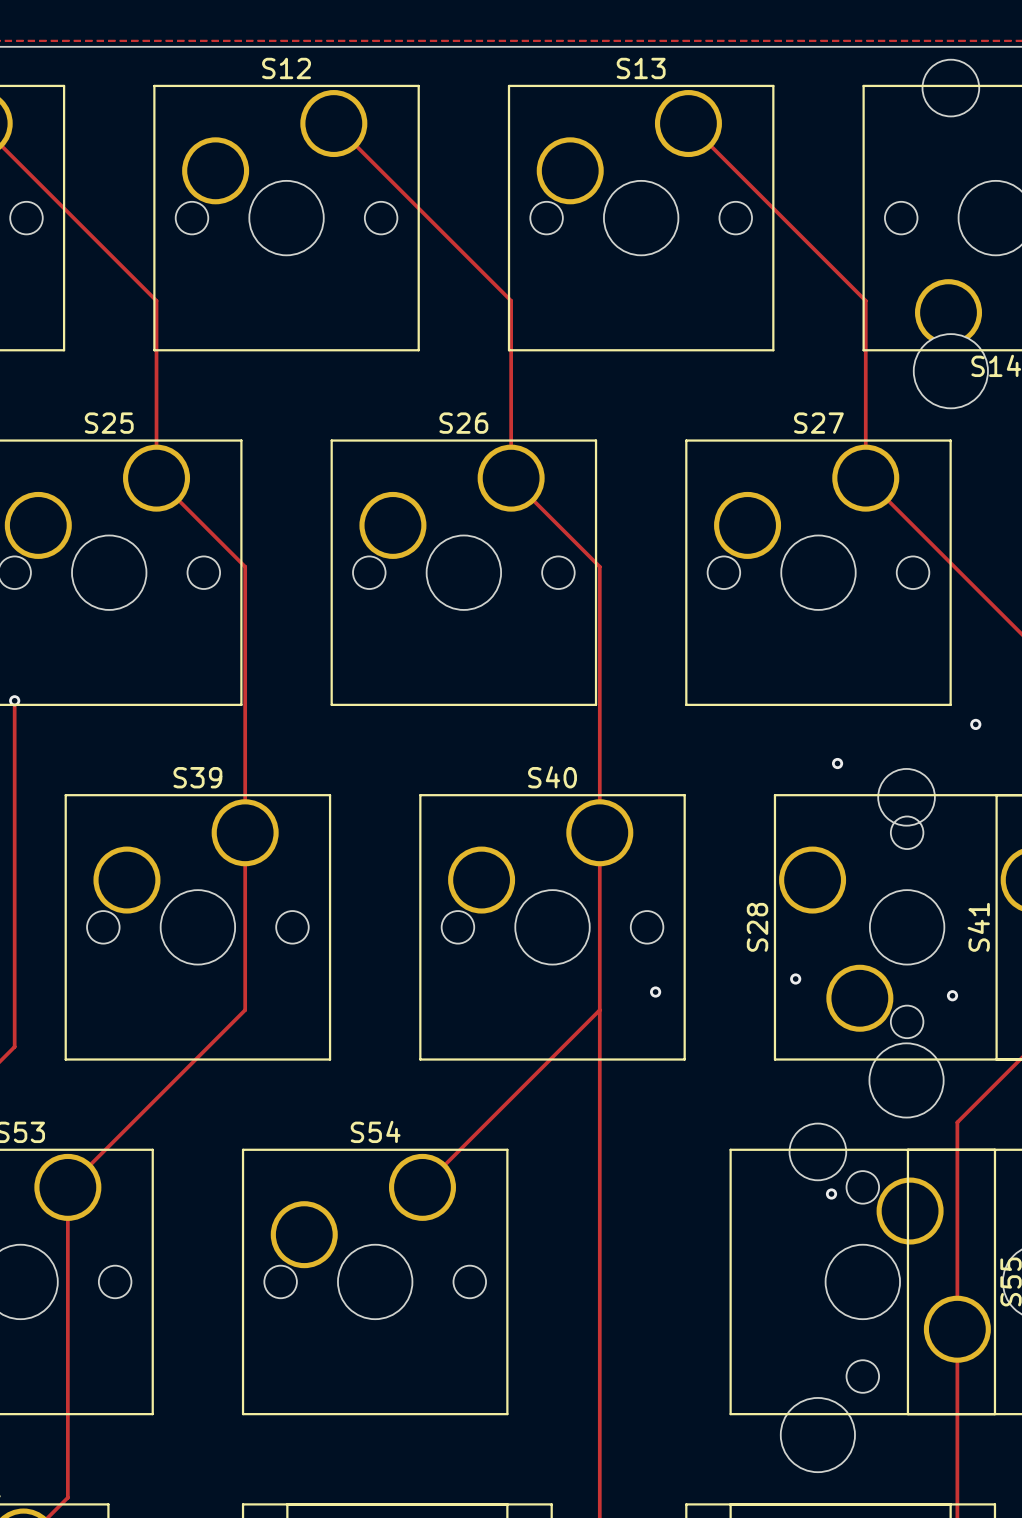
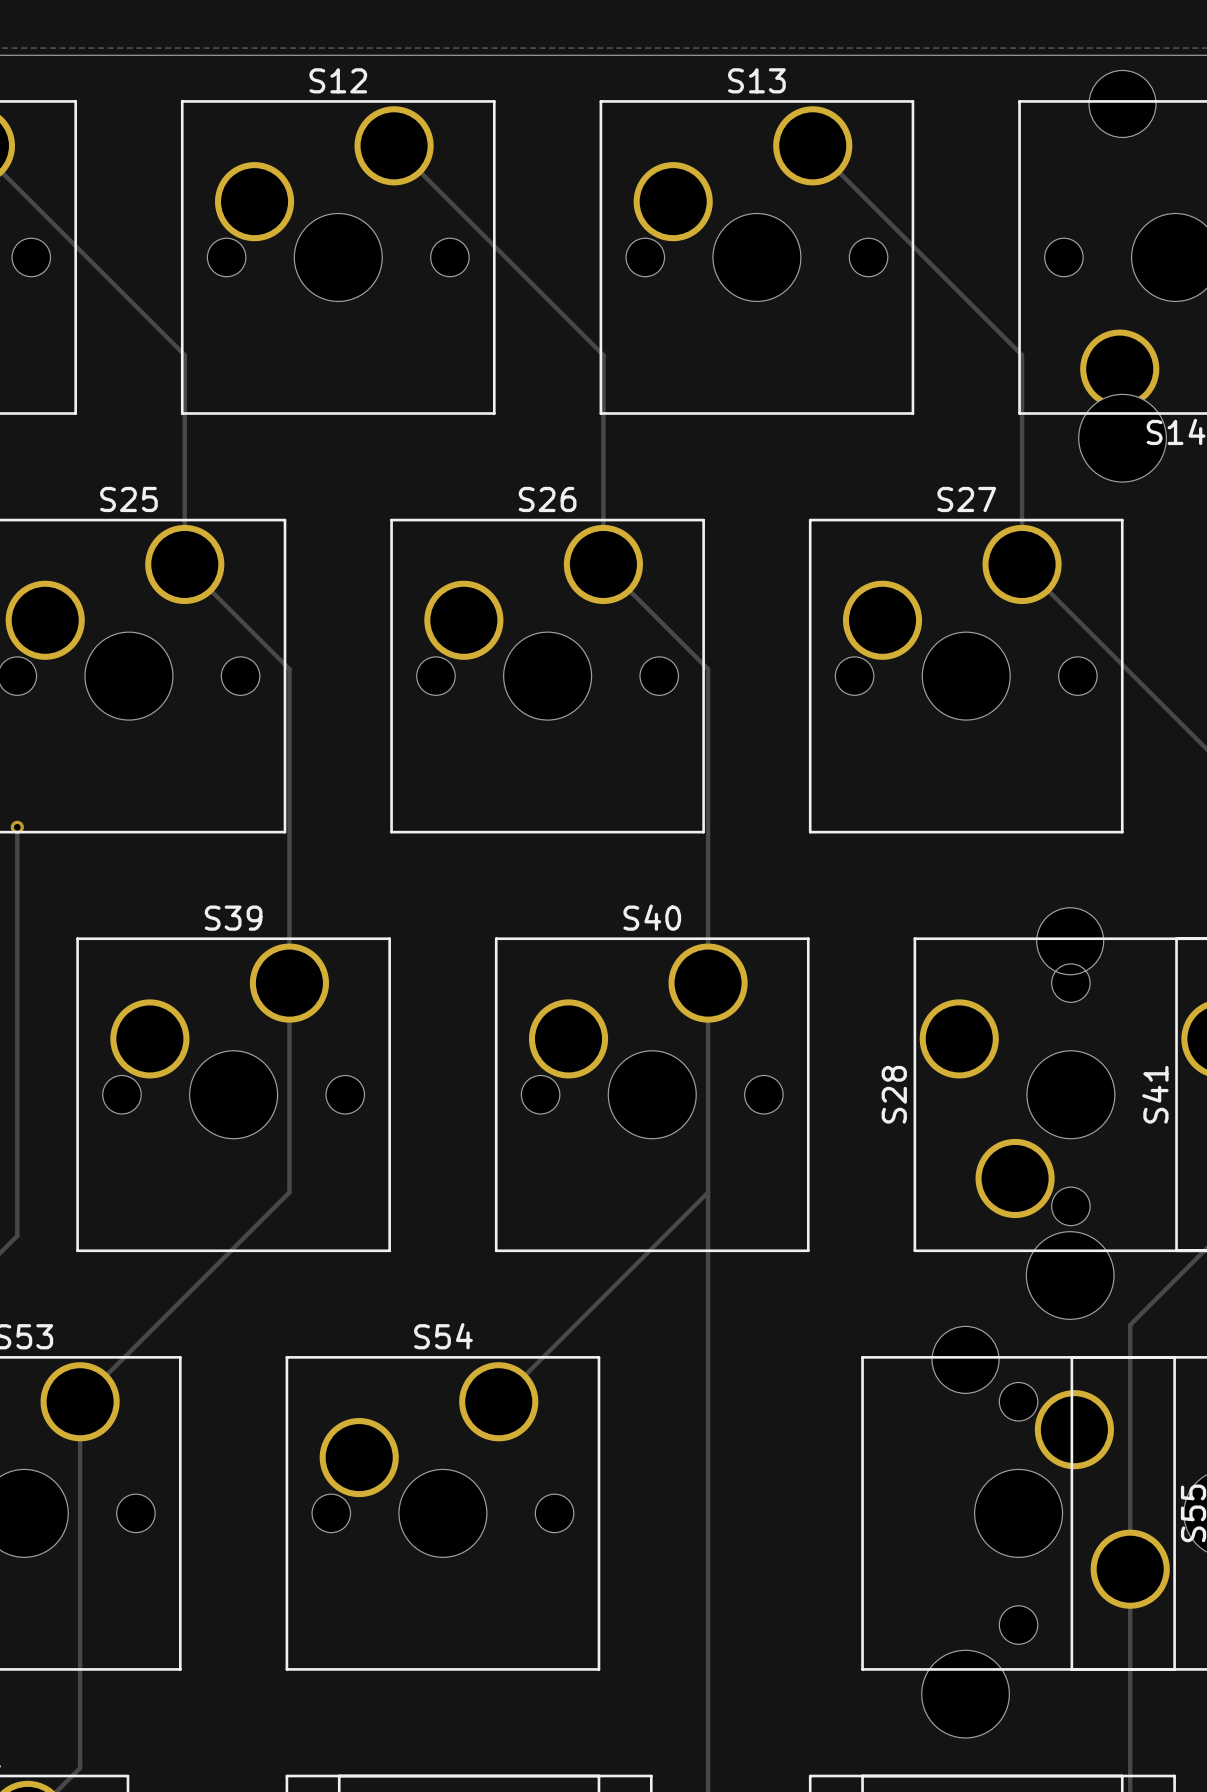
via: (975, 724) -> none
via: (837, 763) -> none
via: (795, 978) -> none
via: (655, 992) -> none
via: (952, 995) -> none
via: (831, 1194) -> none

